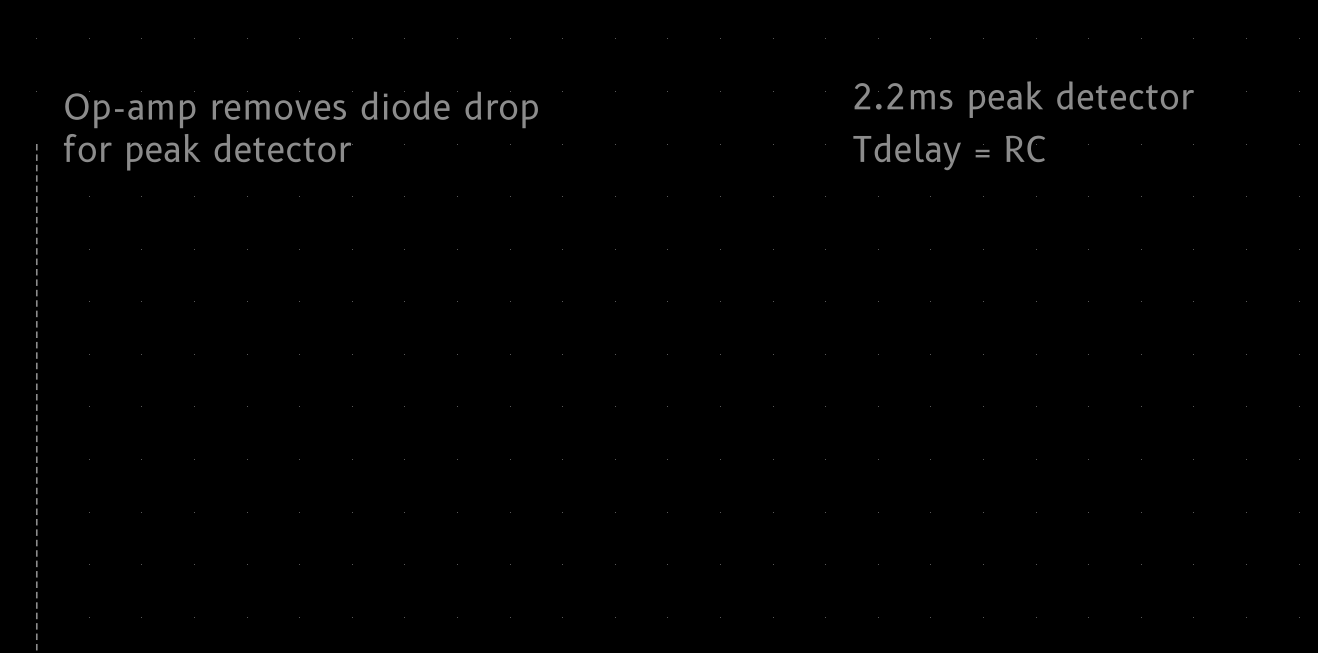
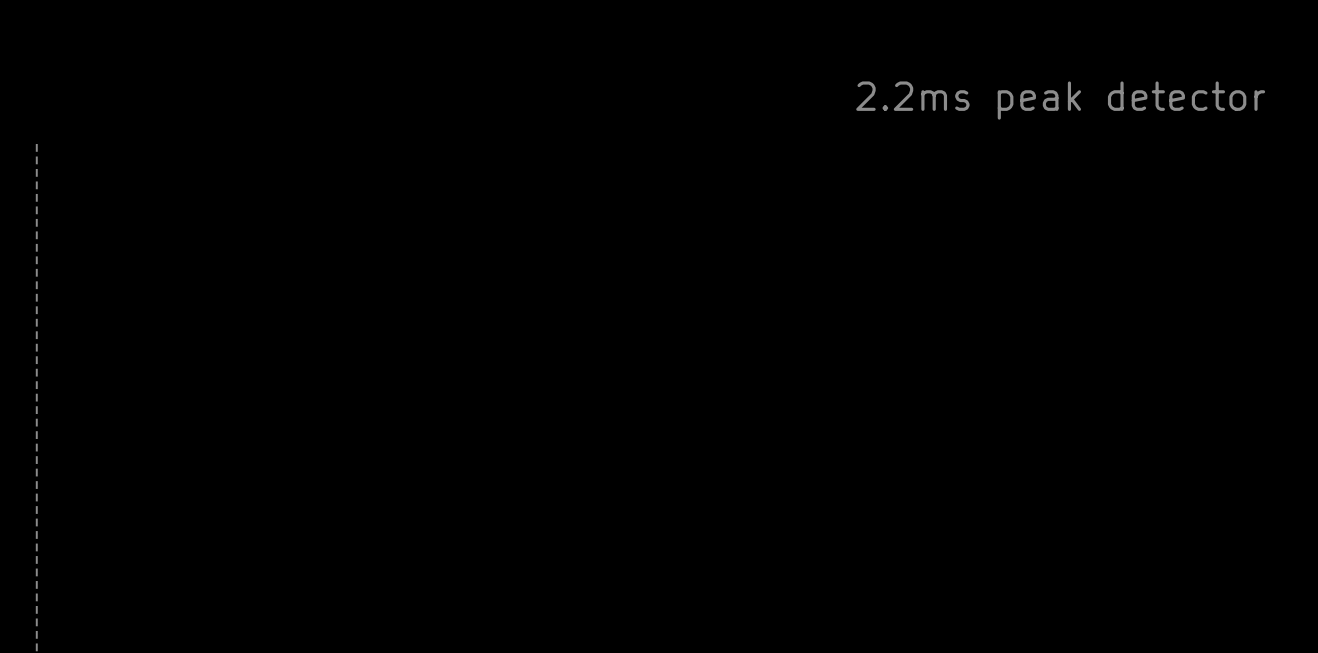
text: Op-amp removes diode drop (301, 109) -> none
text: for peak detector (207, 152) -> none
text: Tdelay = RC (949, 152) -> none

